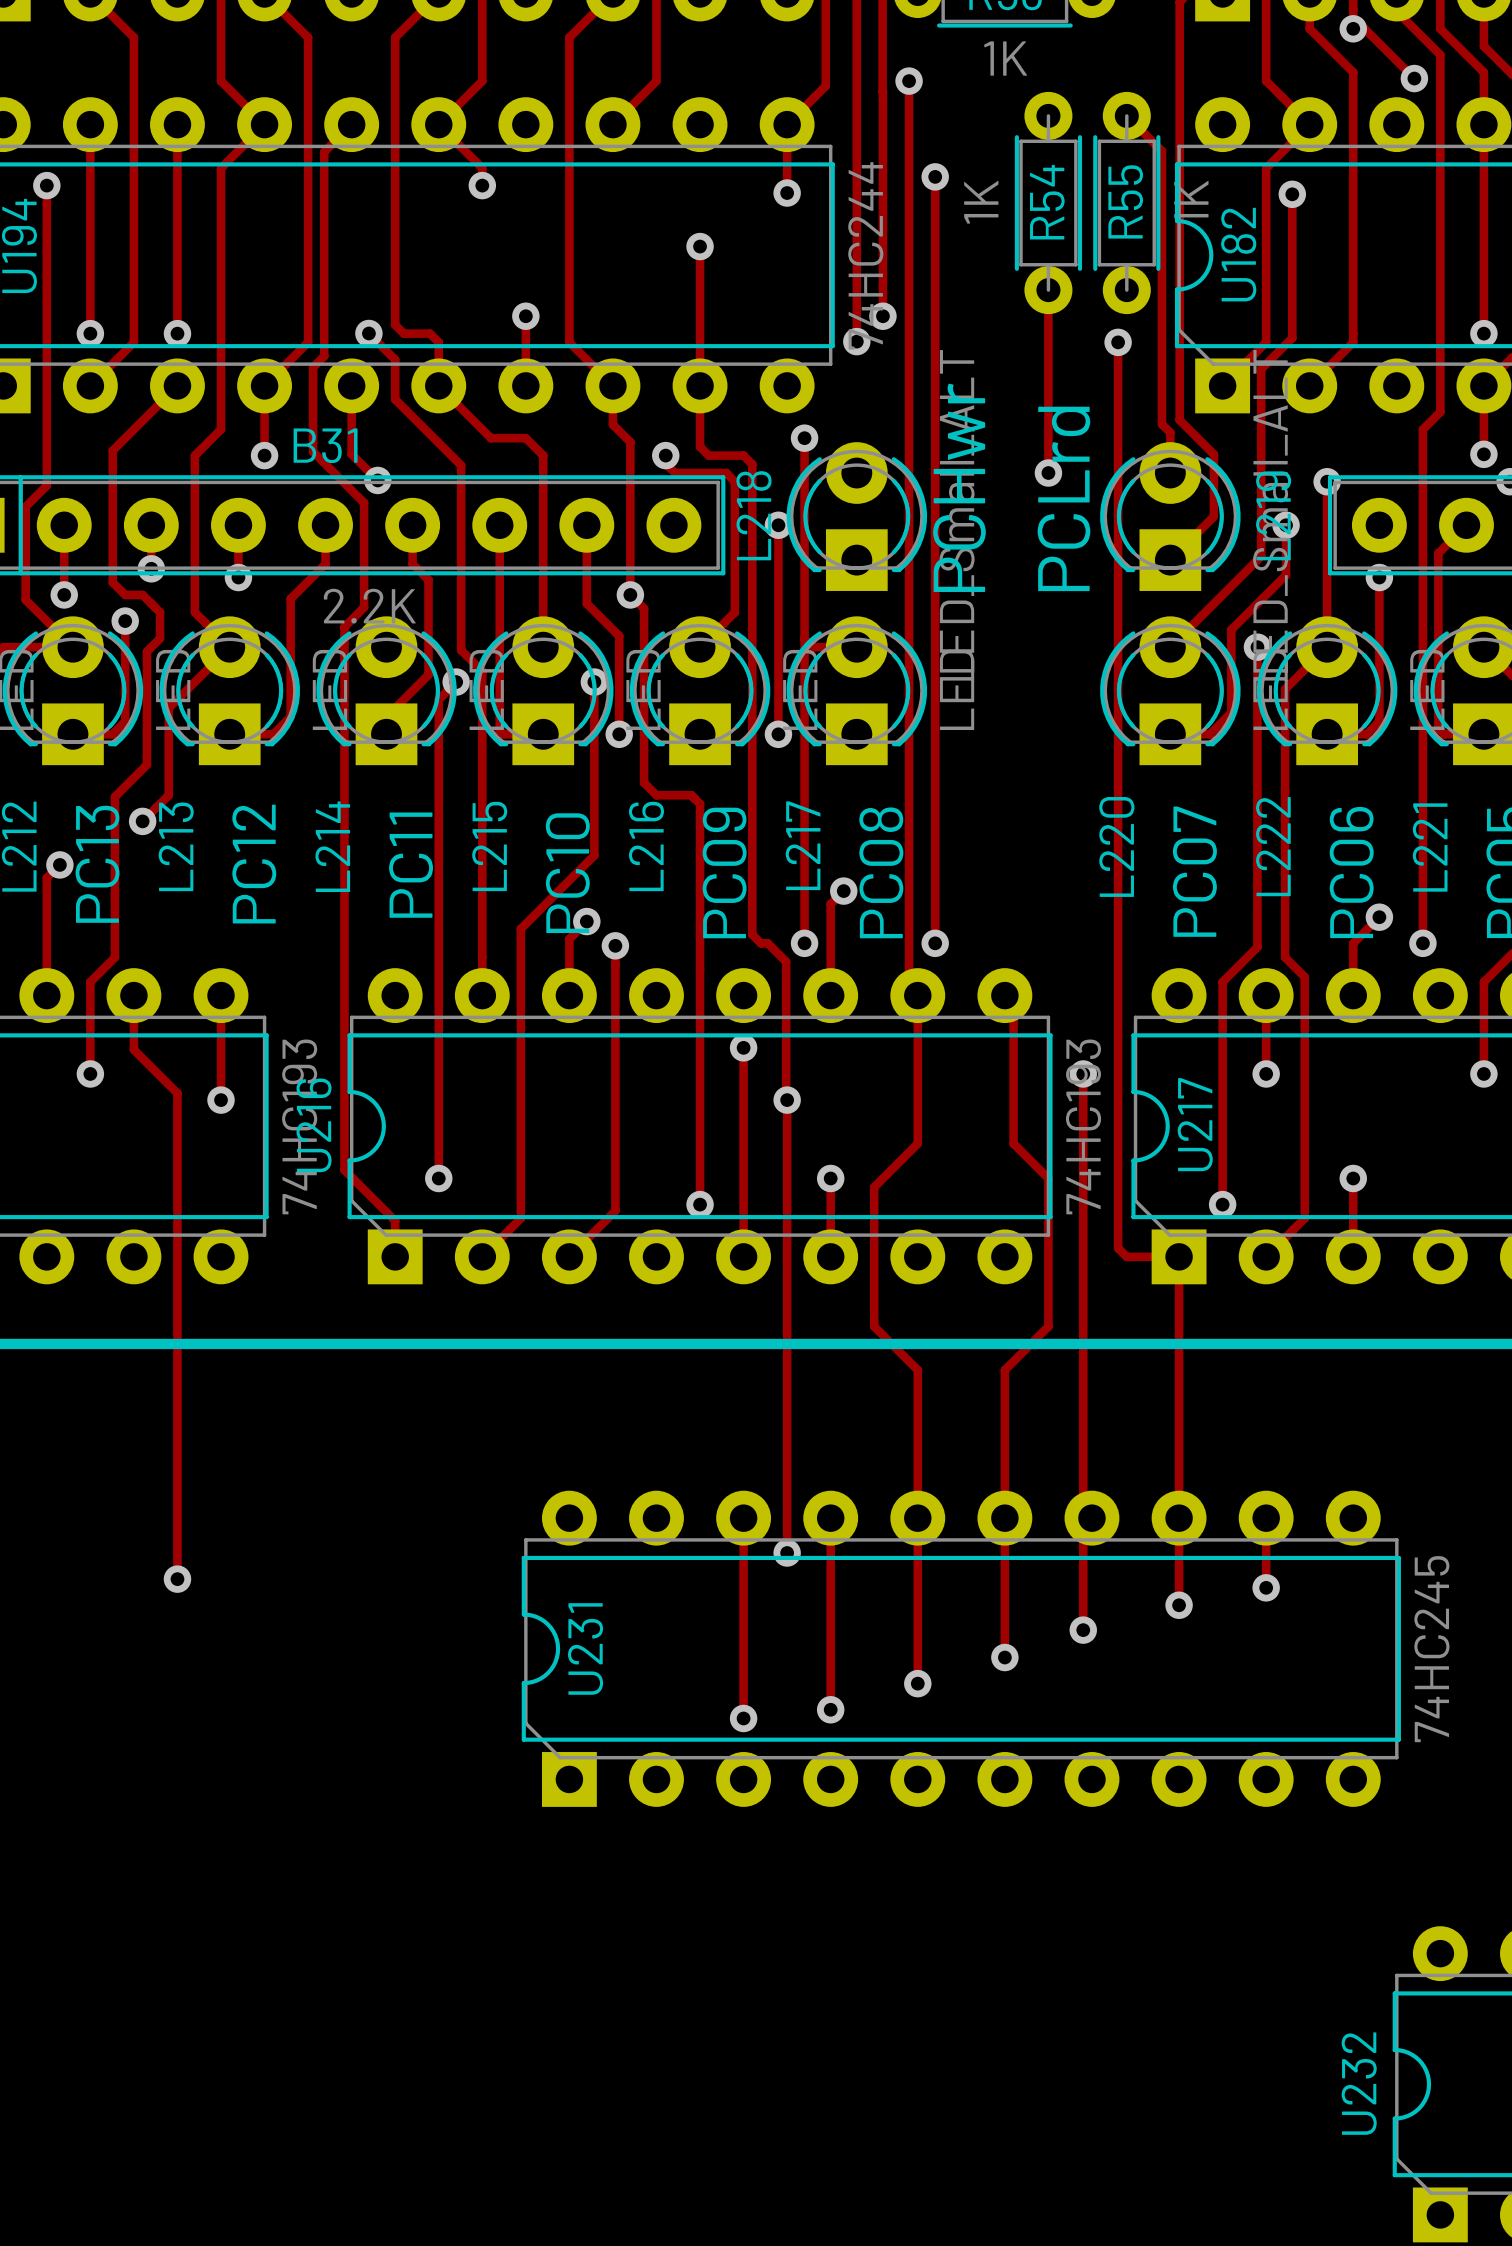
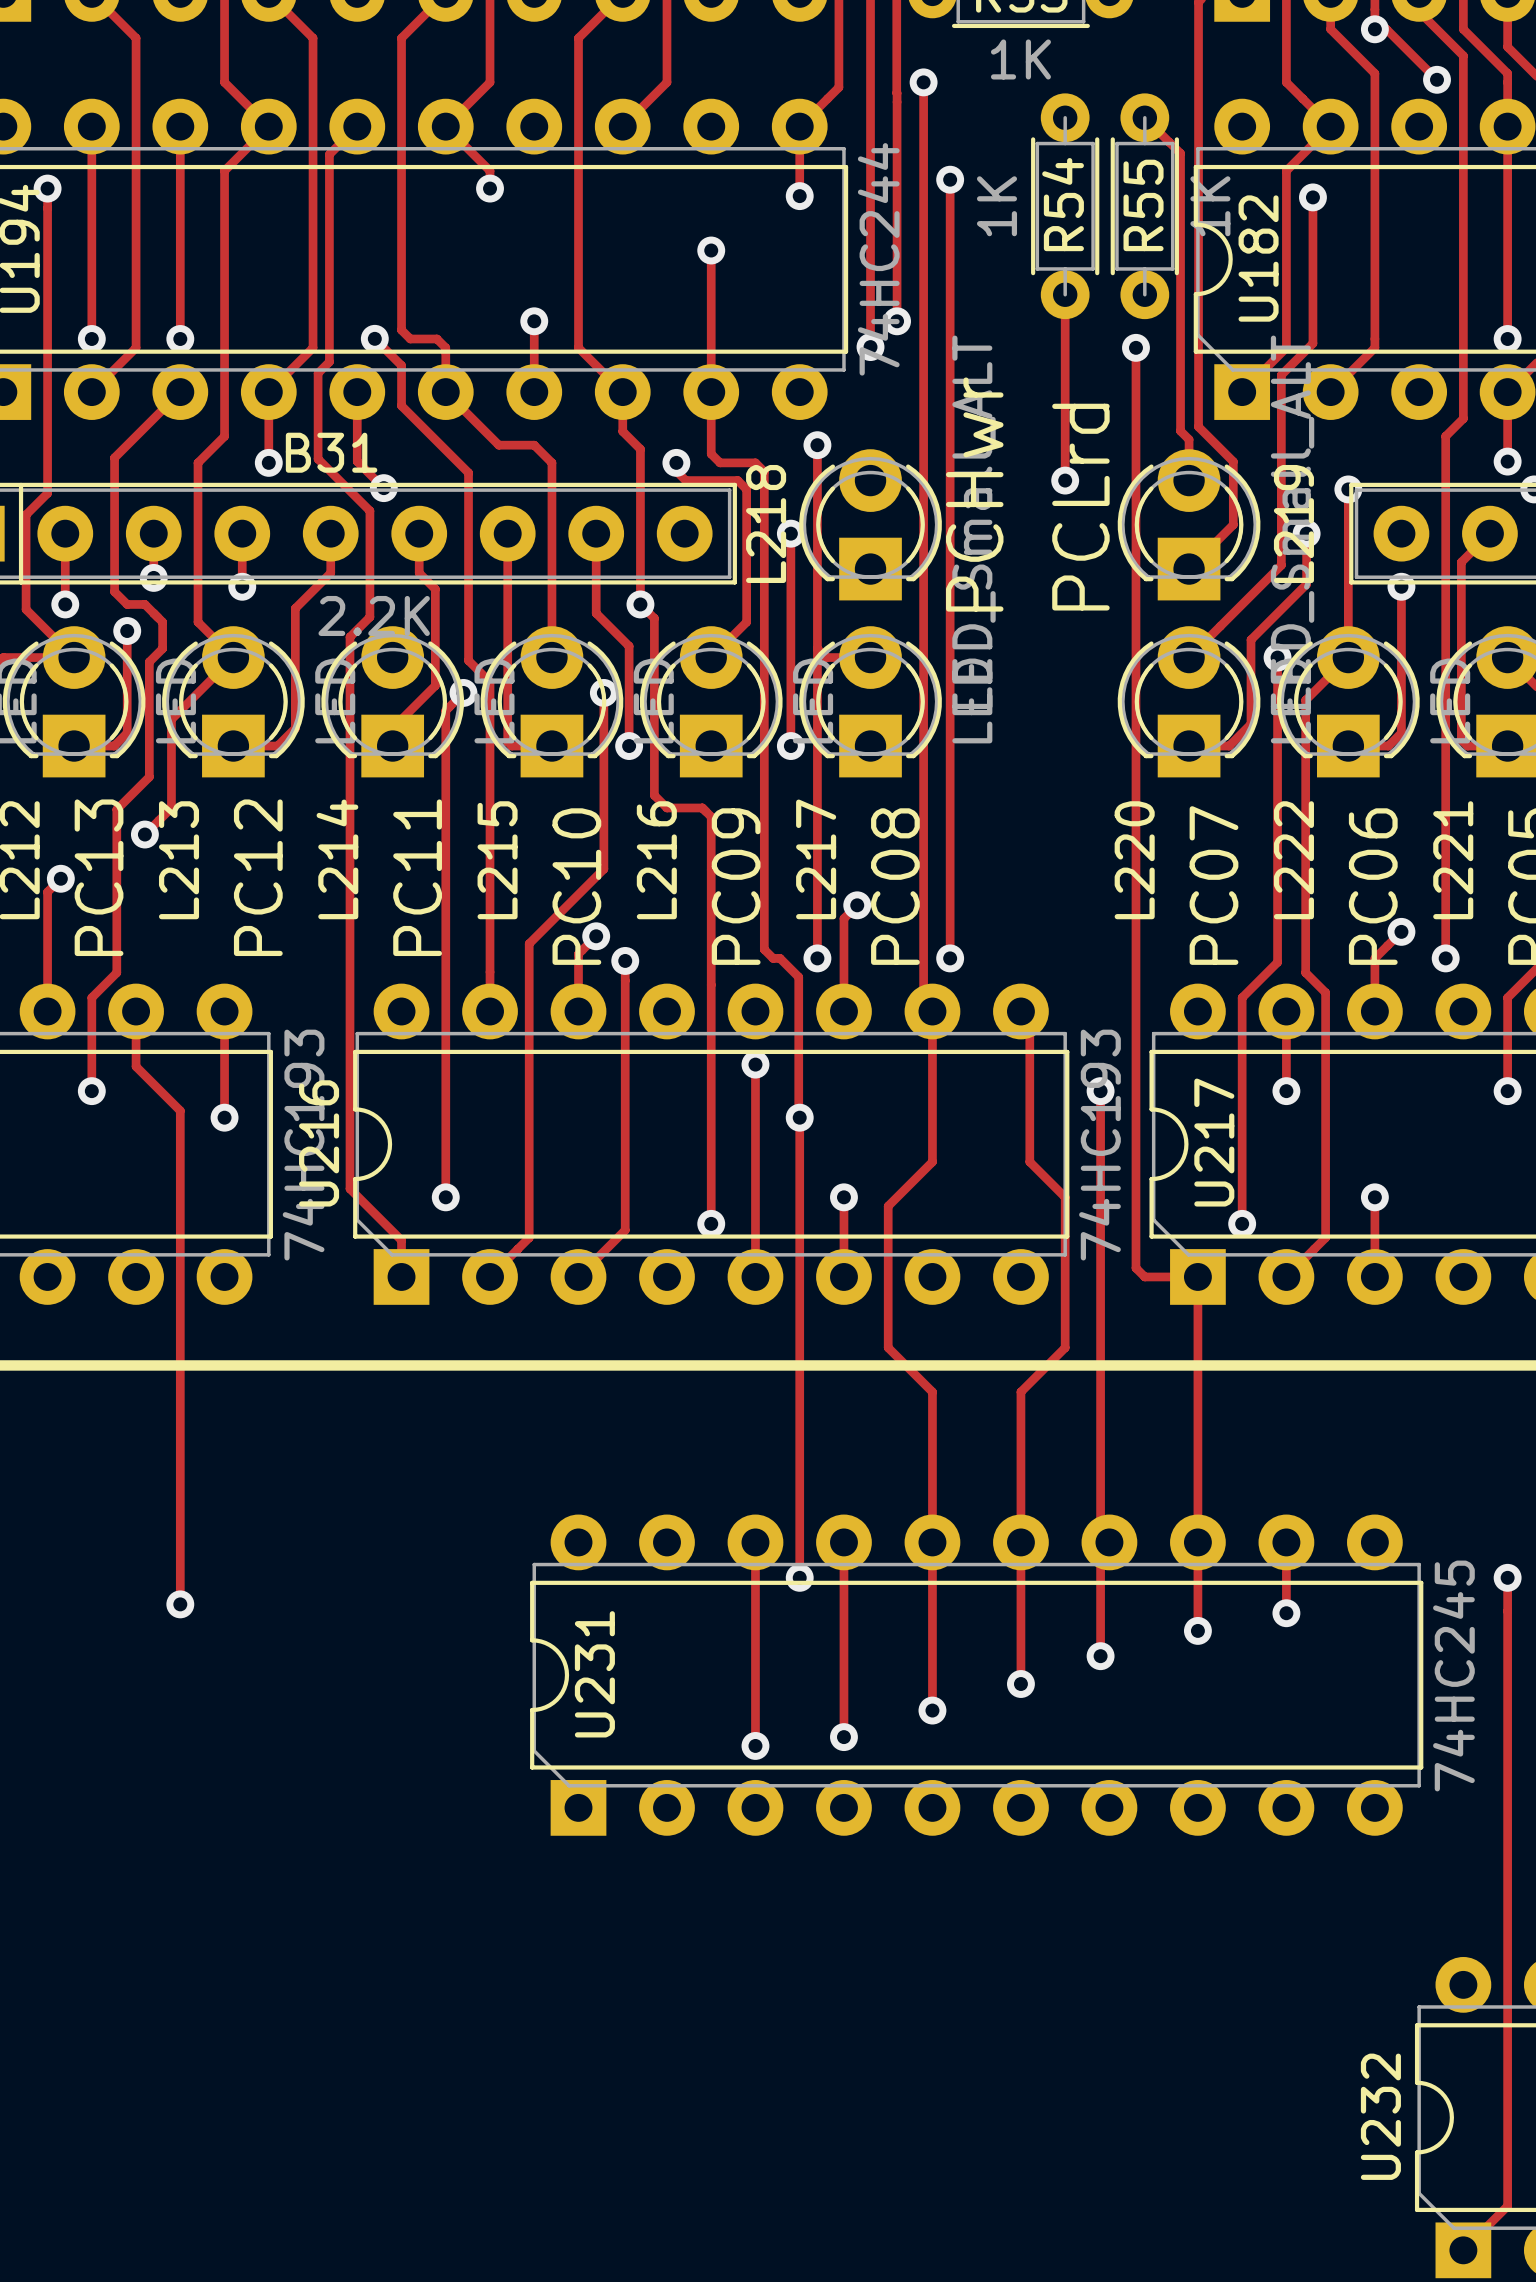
track: none -> (1507, 1577) (1507, 2206) (1463, 2250)
via: none -> (1507, 1577)

